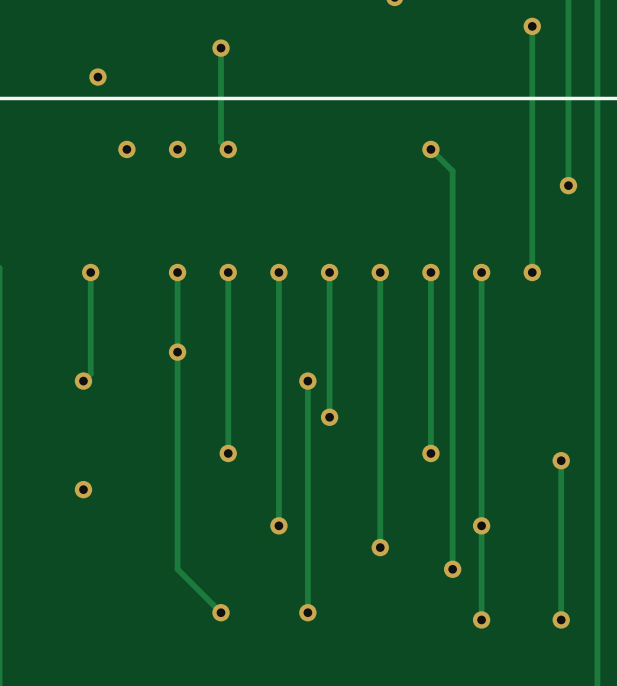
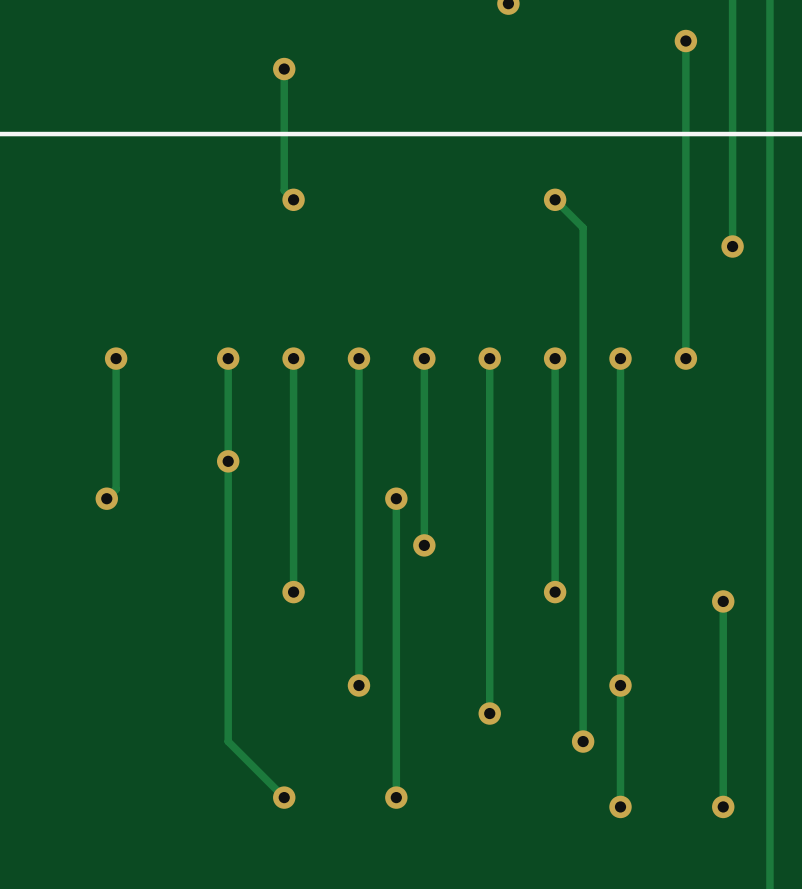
via: (97, 77) -> none
via: (126, 149) -> none
via: (177, 149) -> none
via: (83, 489) -> none

